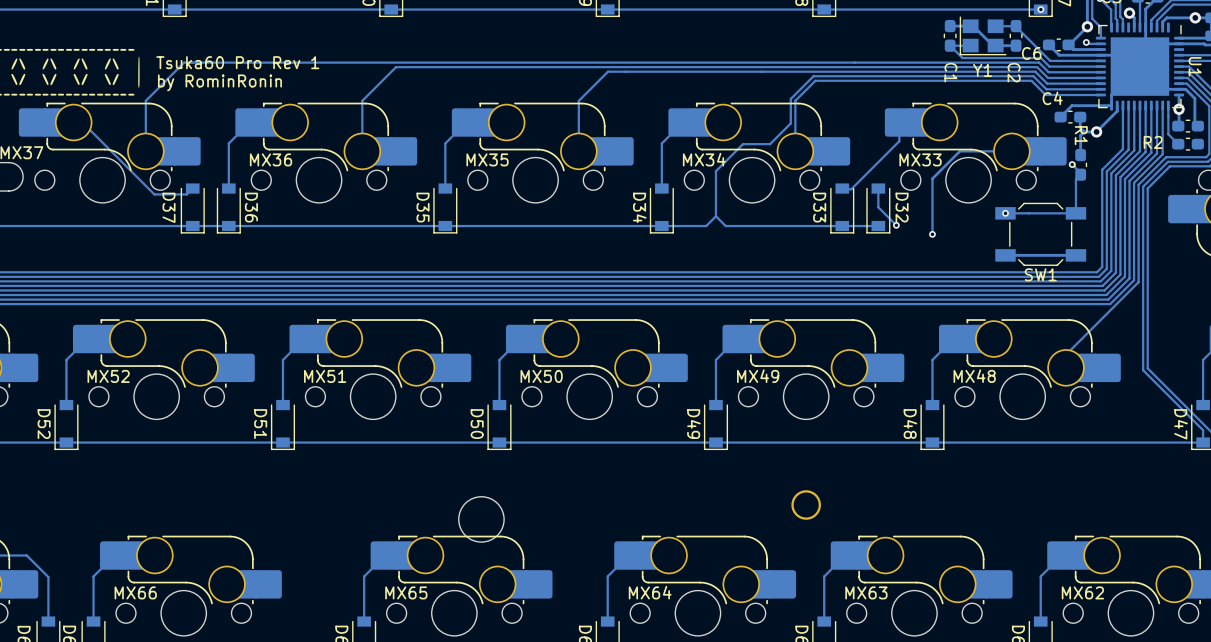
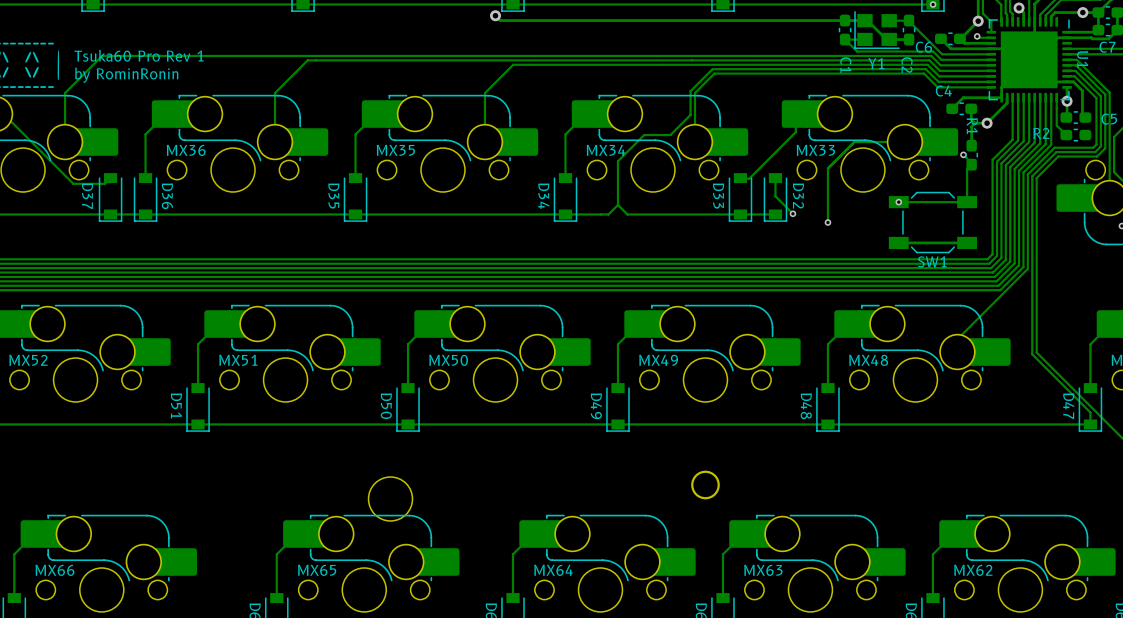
track: none -> (495, 15) (500, 20) (845, 20)
via: none -> (495, 15)

